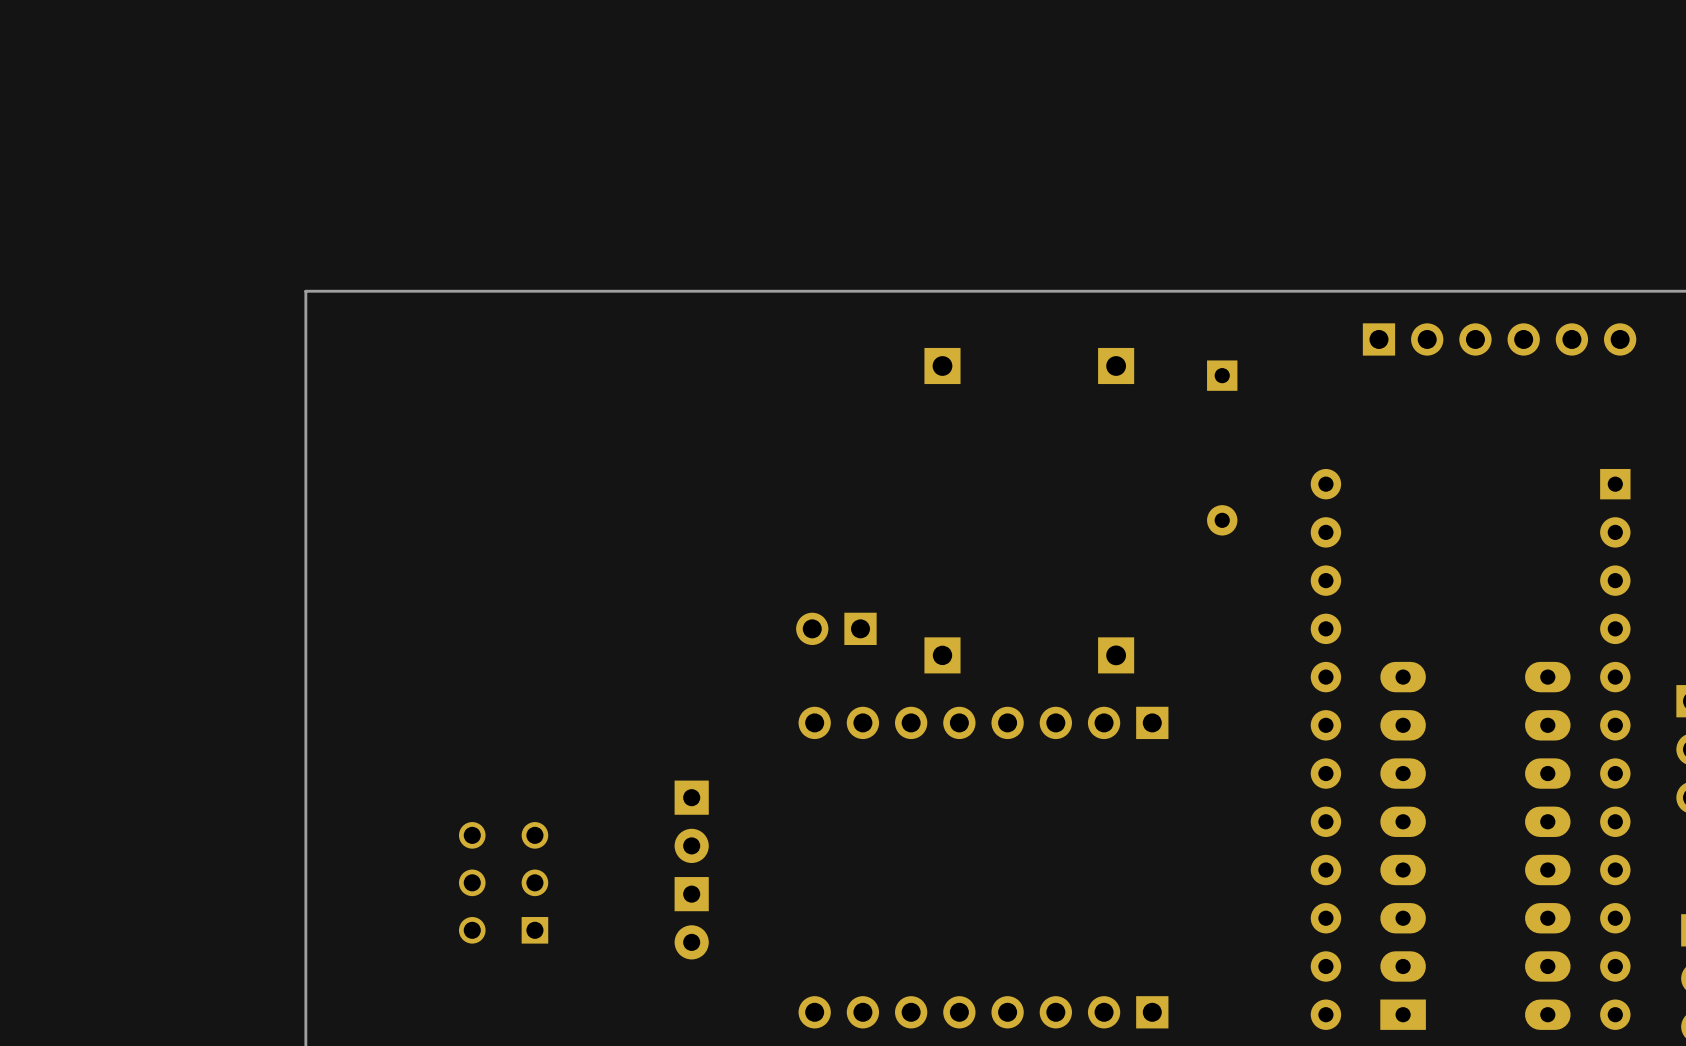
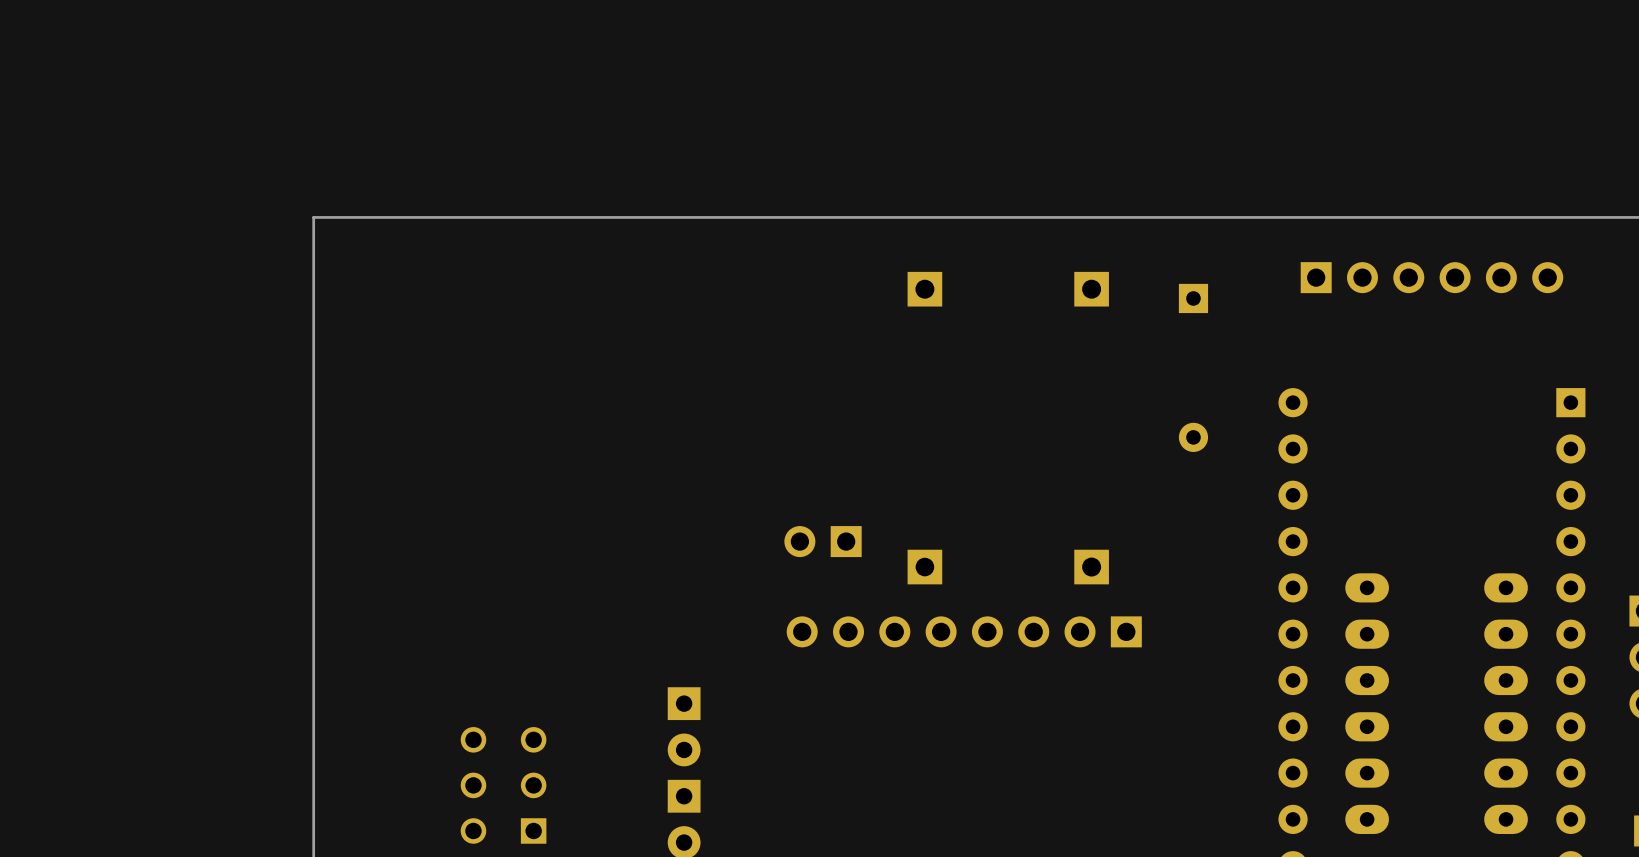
part position: (1499, 339) -> (1431, 277)

